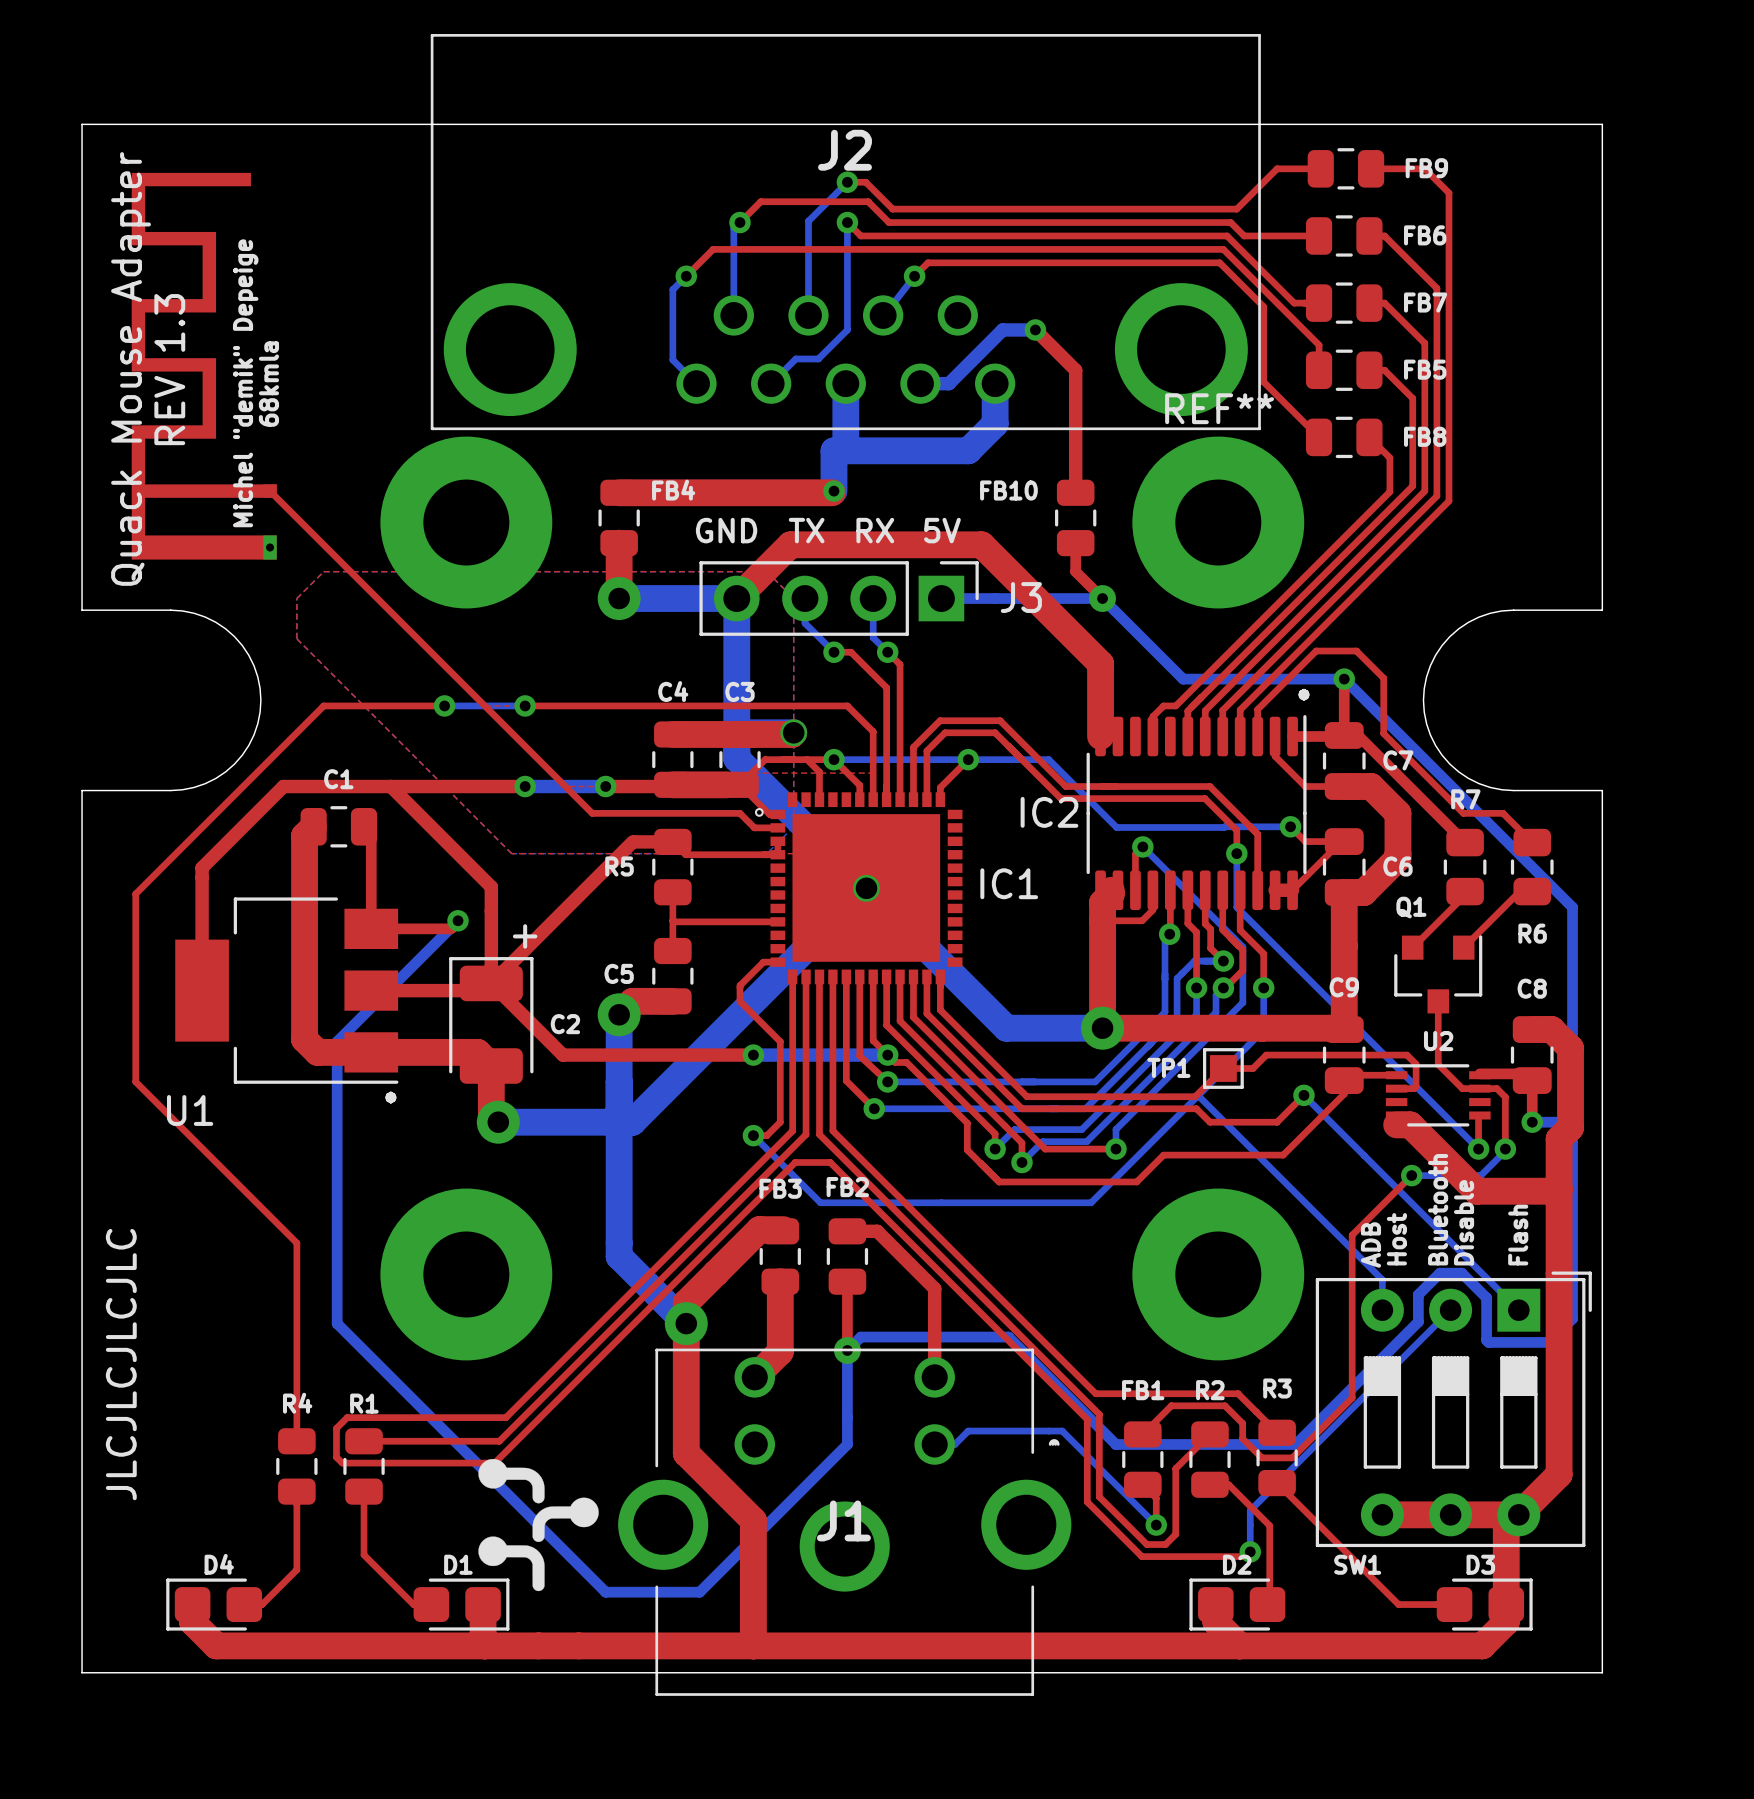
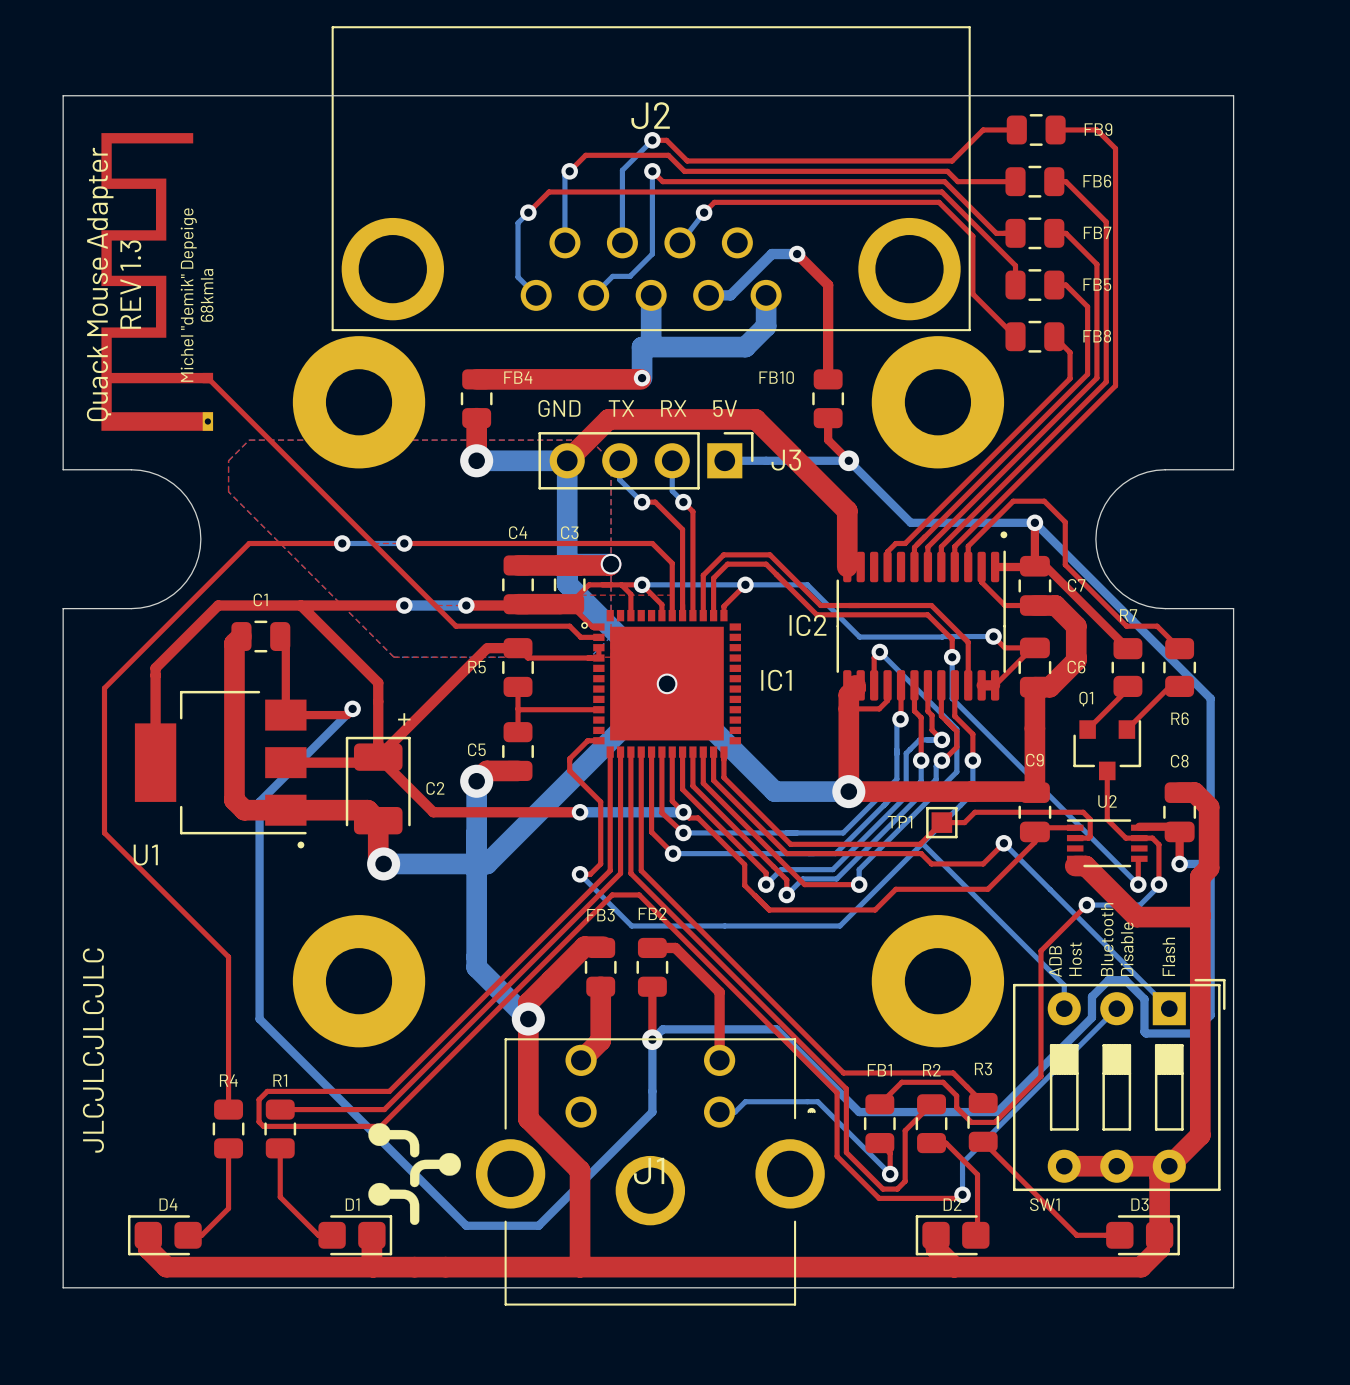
REF** name: REF** (1219, 408) -> none

